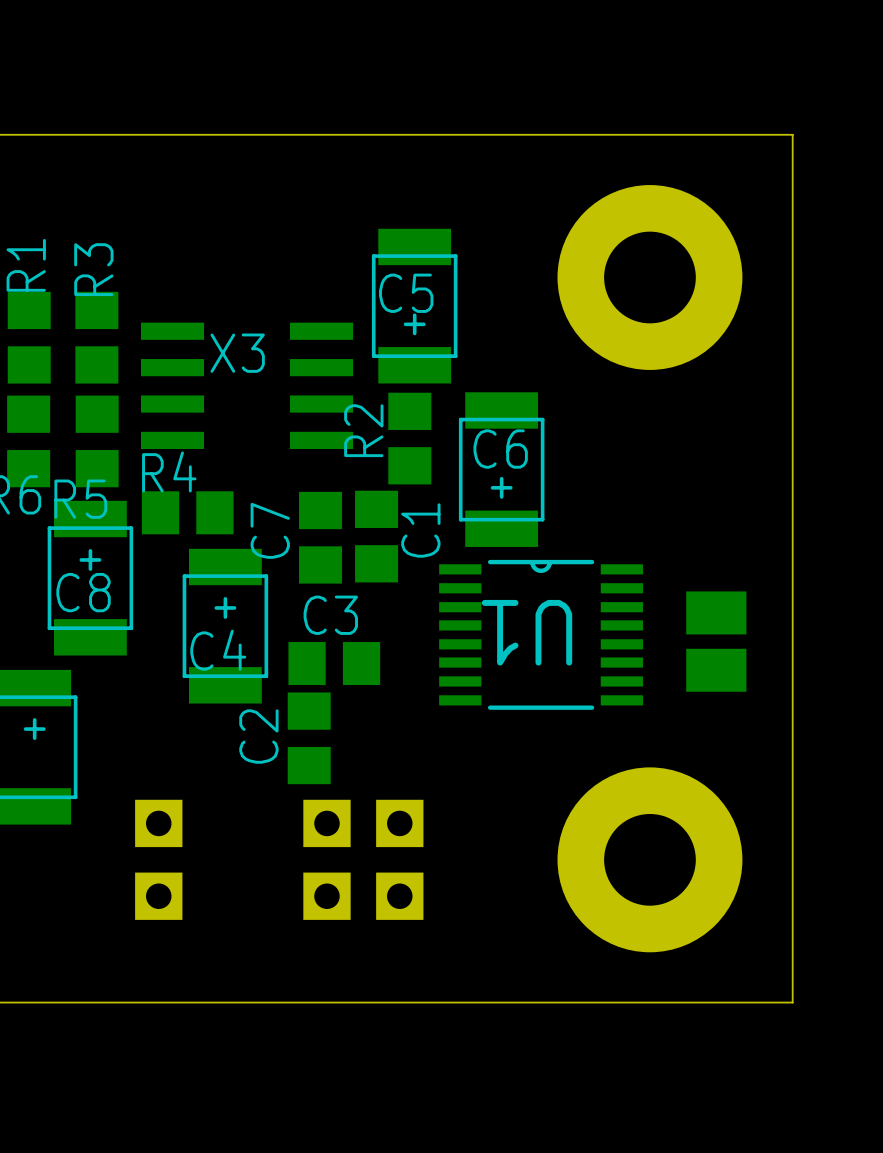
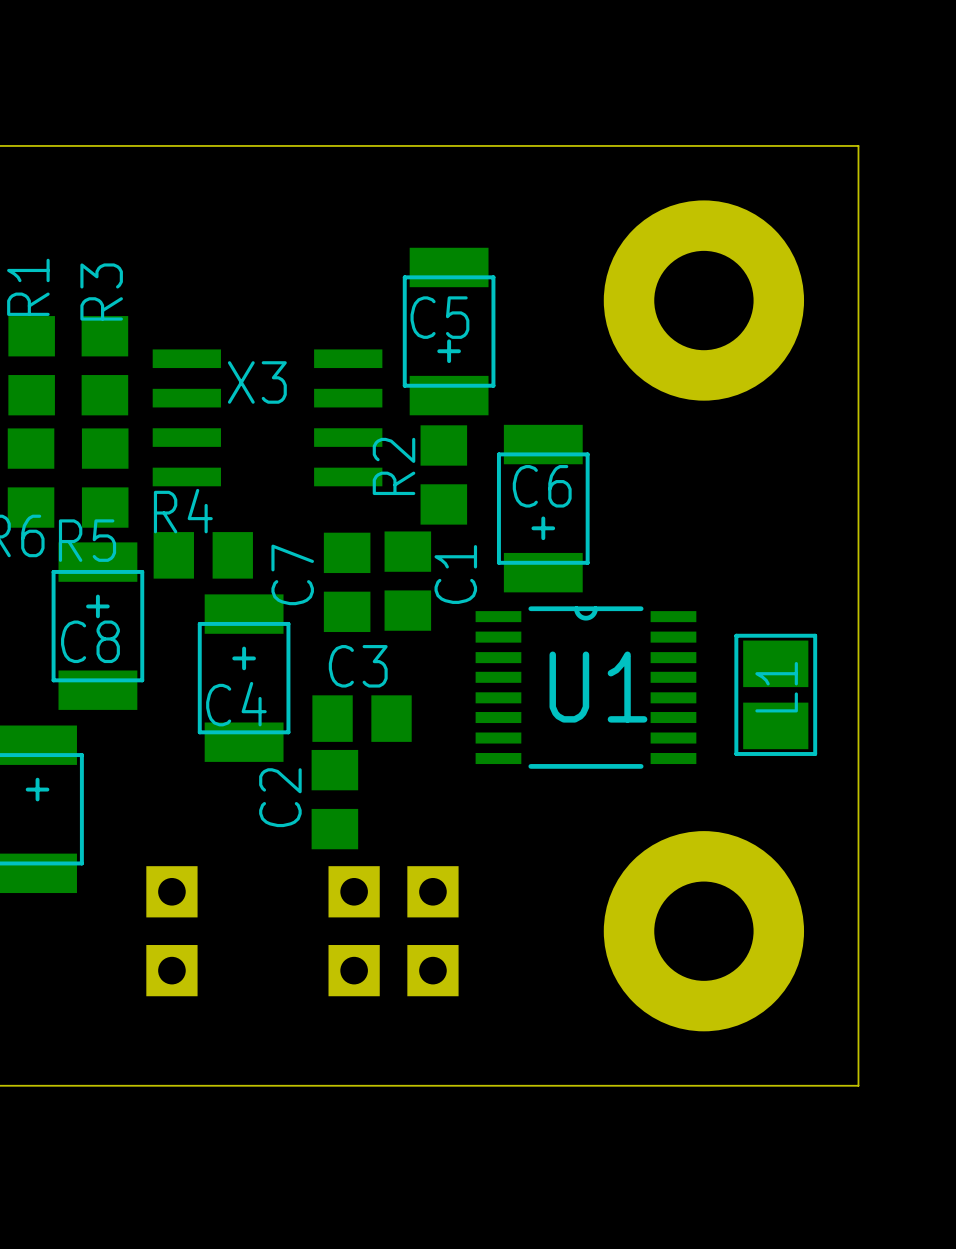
U1 name rotation: 0° (526, 632) -> 180° (598, 687)
part: (716, 641) -> none
L1: none -> (775, 694)

